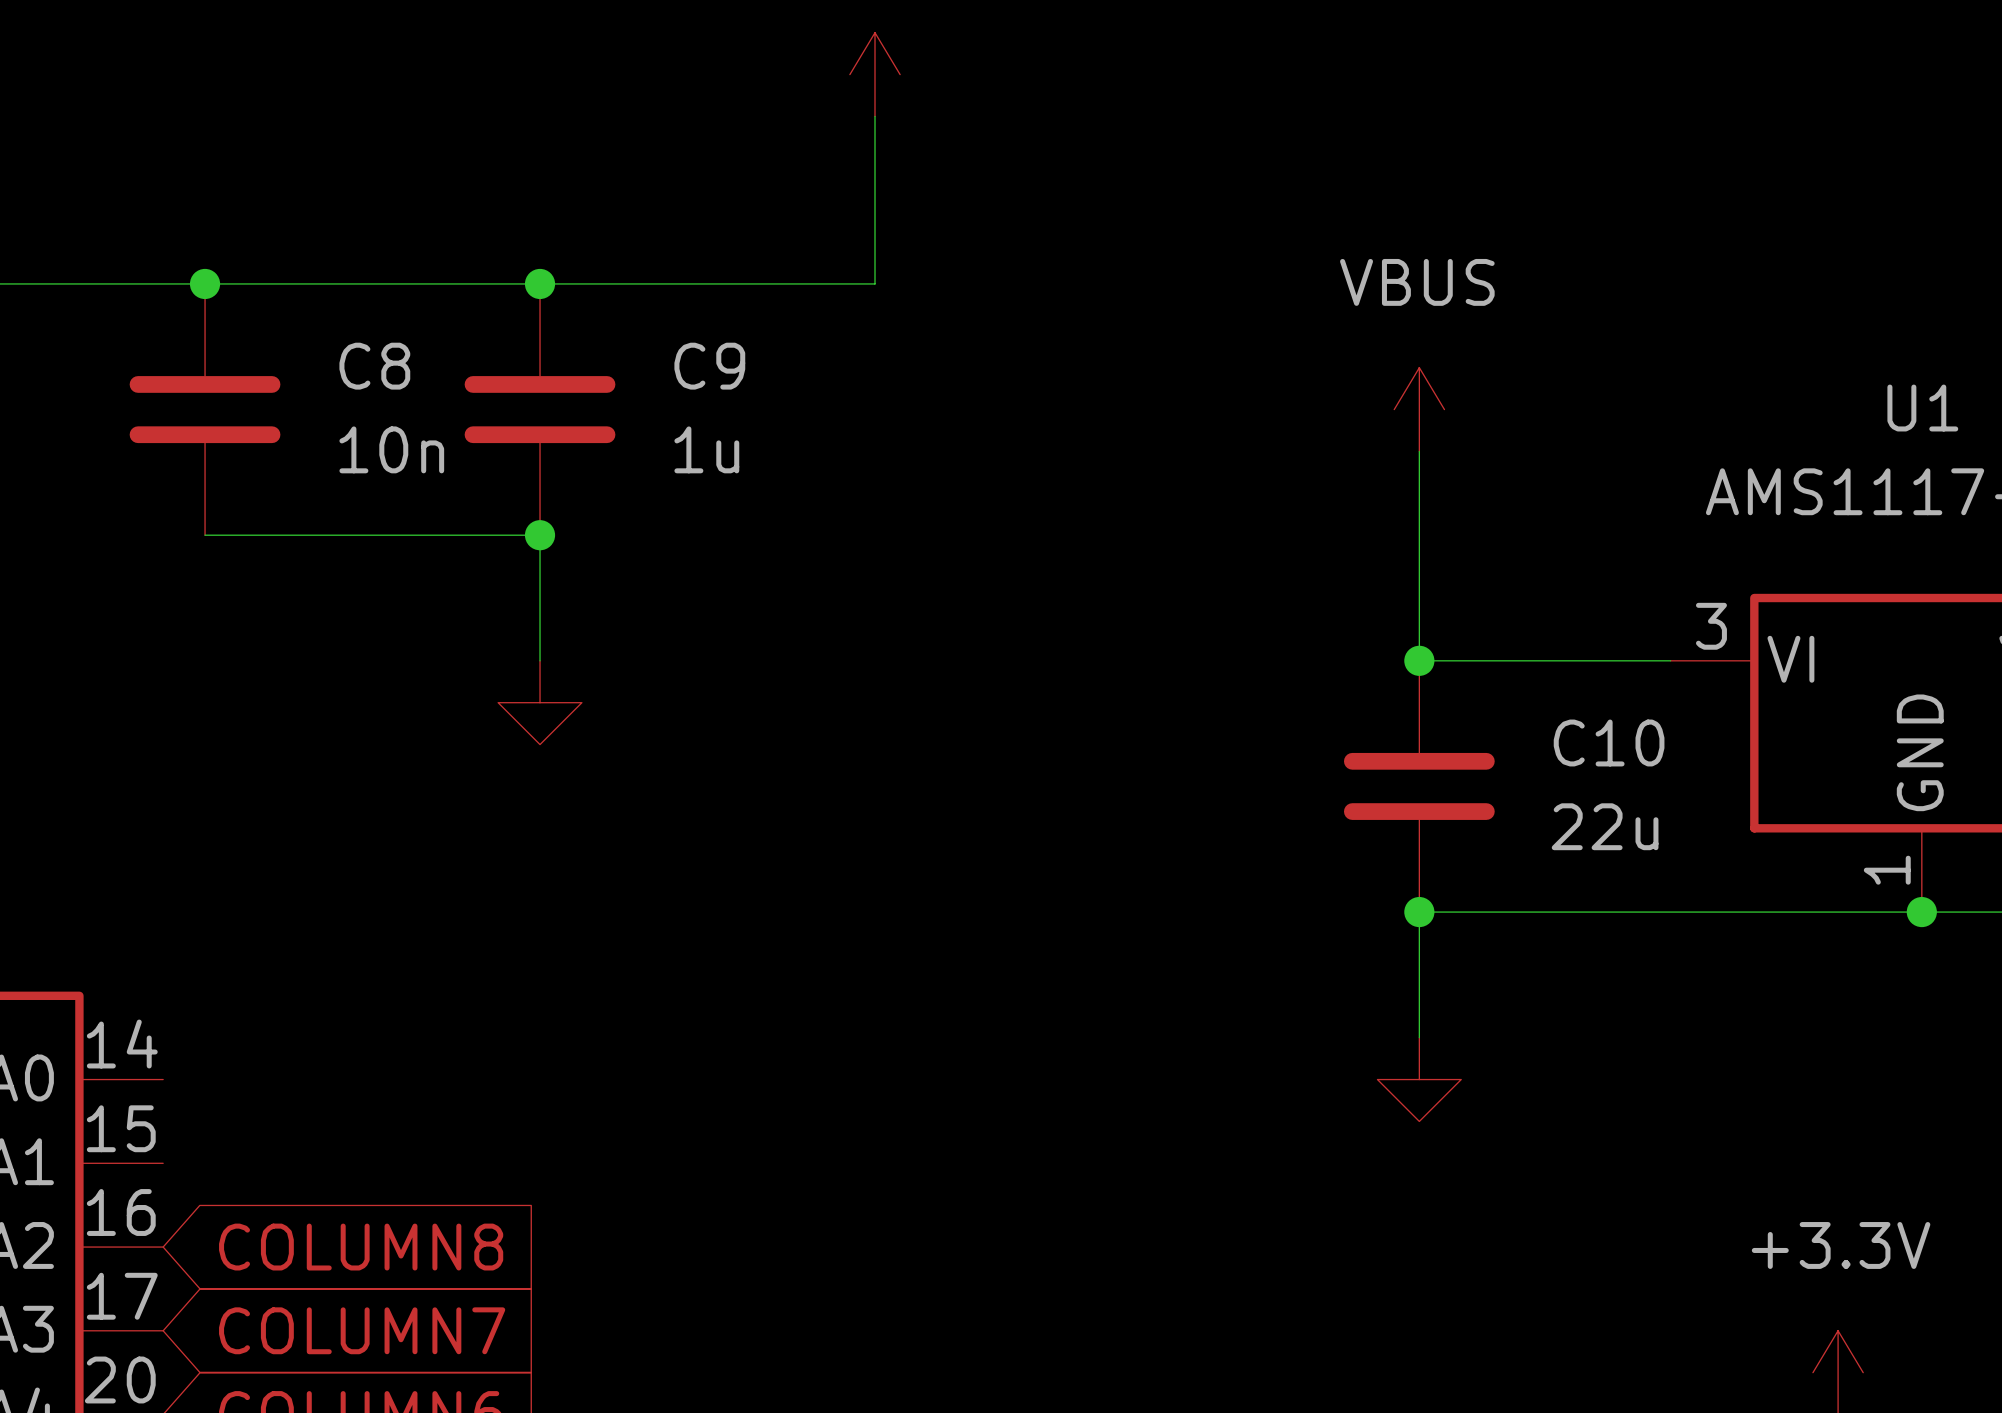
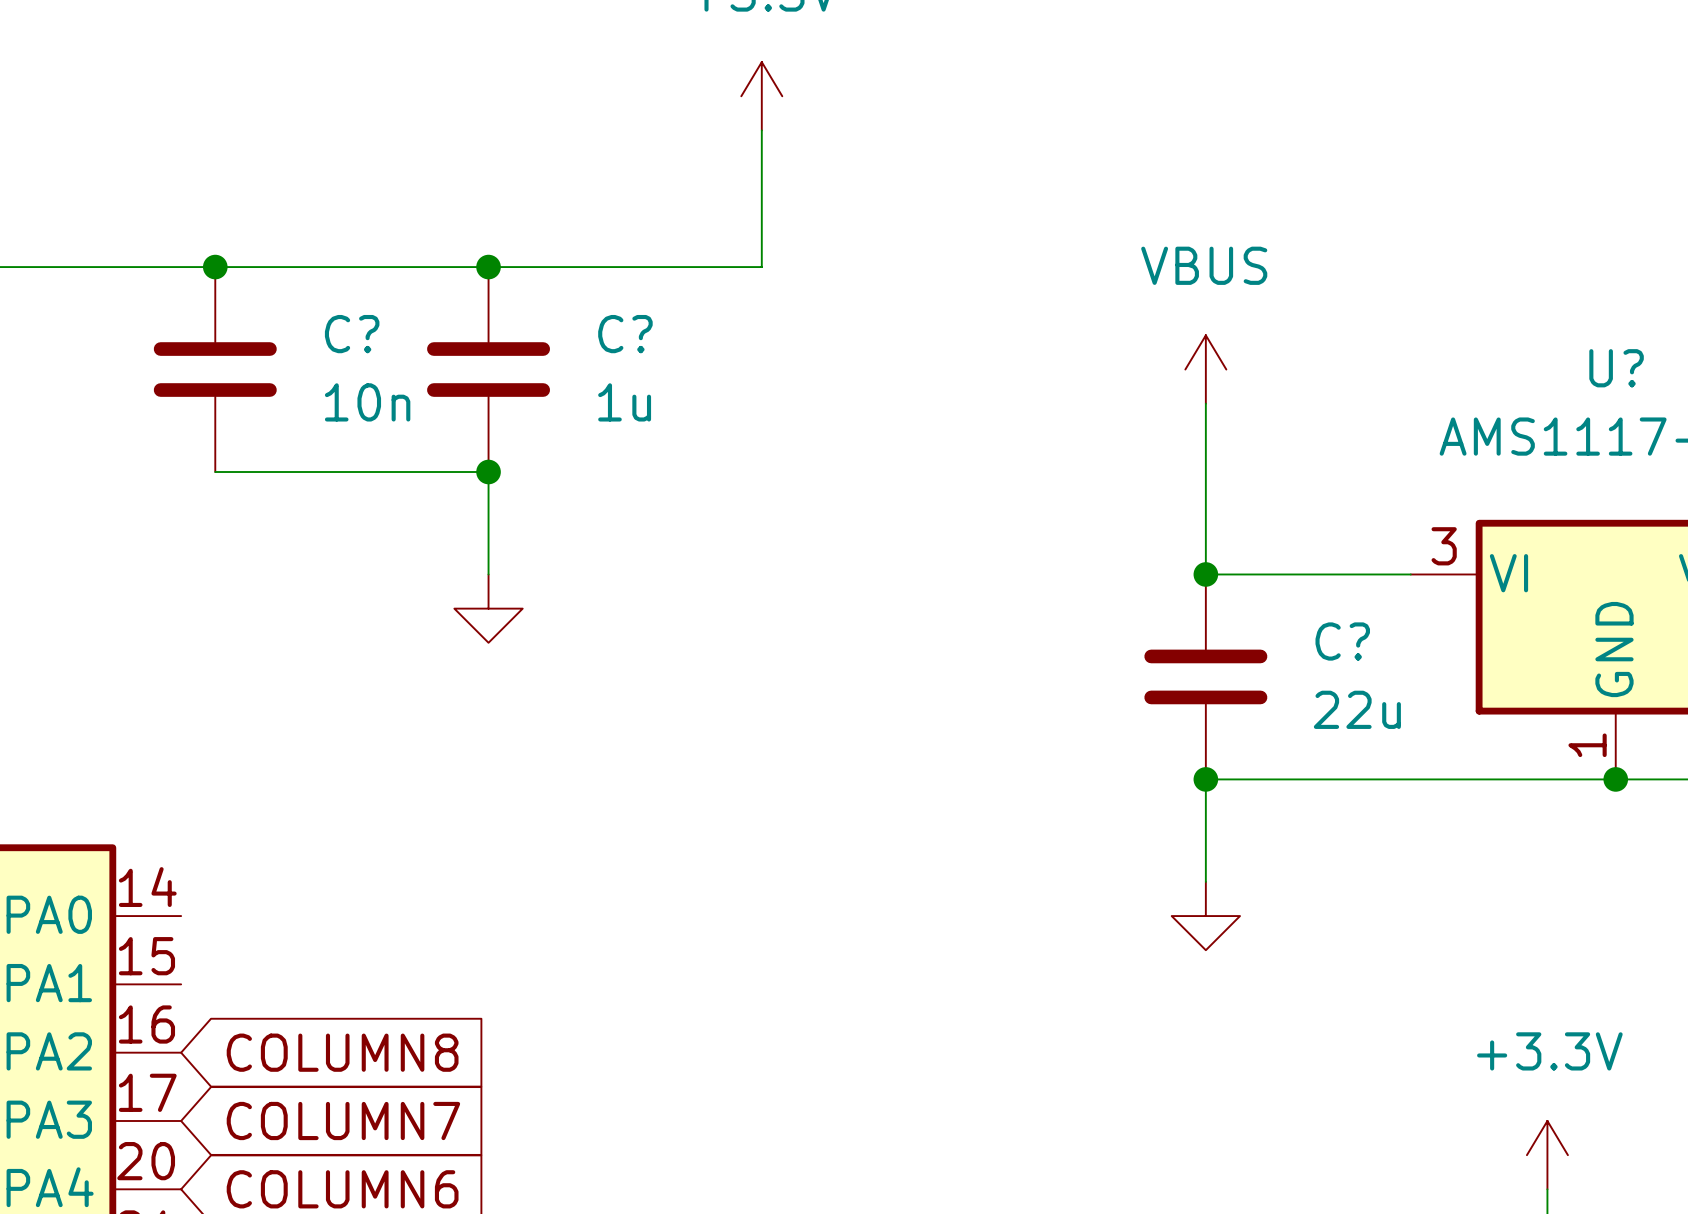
C8 name: C8 (374, 366) -> C? (352, 334)
C9 name: C9 (709, 366) -> C? (625, 334)
U1 name: U1 (1922, 408) -> U? (1616, 368)
C10 name: C10 (1609, 743) -> C? (1342, 641)

